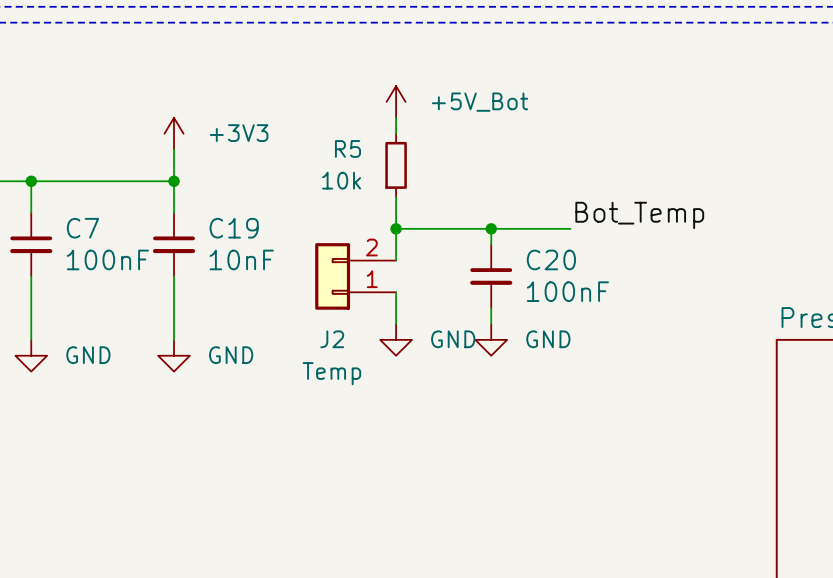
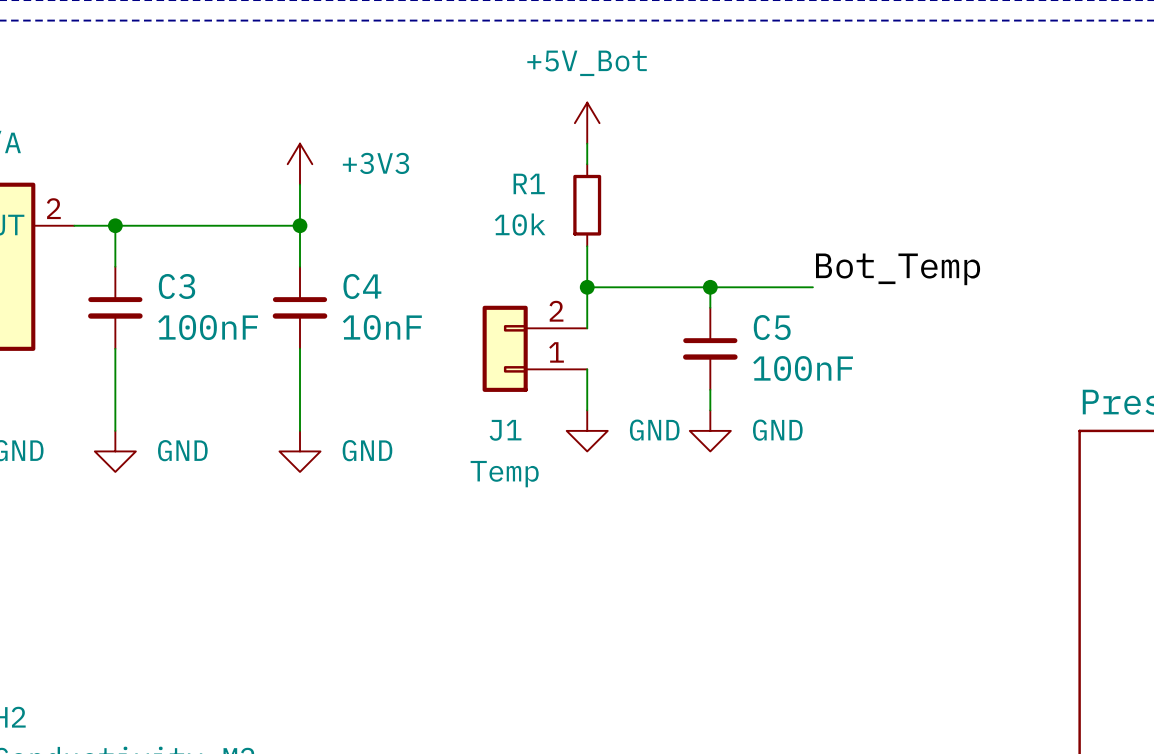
power symbol text position: +5V_Bot (480, 102) -> +5V_Bot (587, 63)
R5 name: R5 (347, 148) -> R1 (529, 183)
C7 name: C7 (82, 228) -> C3 (176, 286)
C19 name: C19 (234, 228) -> C4 (362, 286)
C20 name: C20 (551, 259) -> C5 (772, 327)
J2 name: J2 (332, 339) -> J1 (505, 430)

